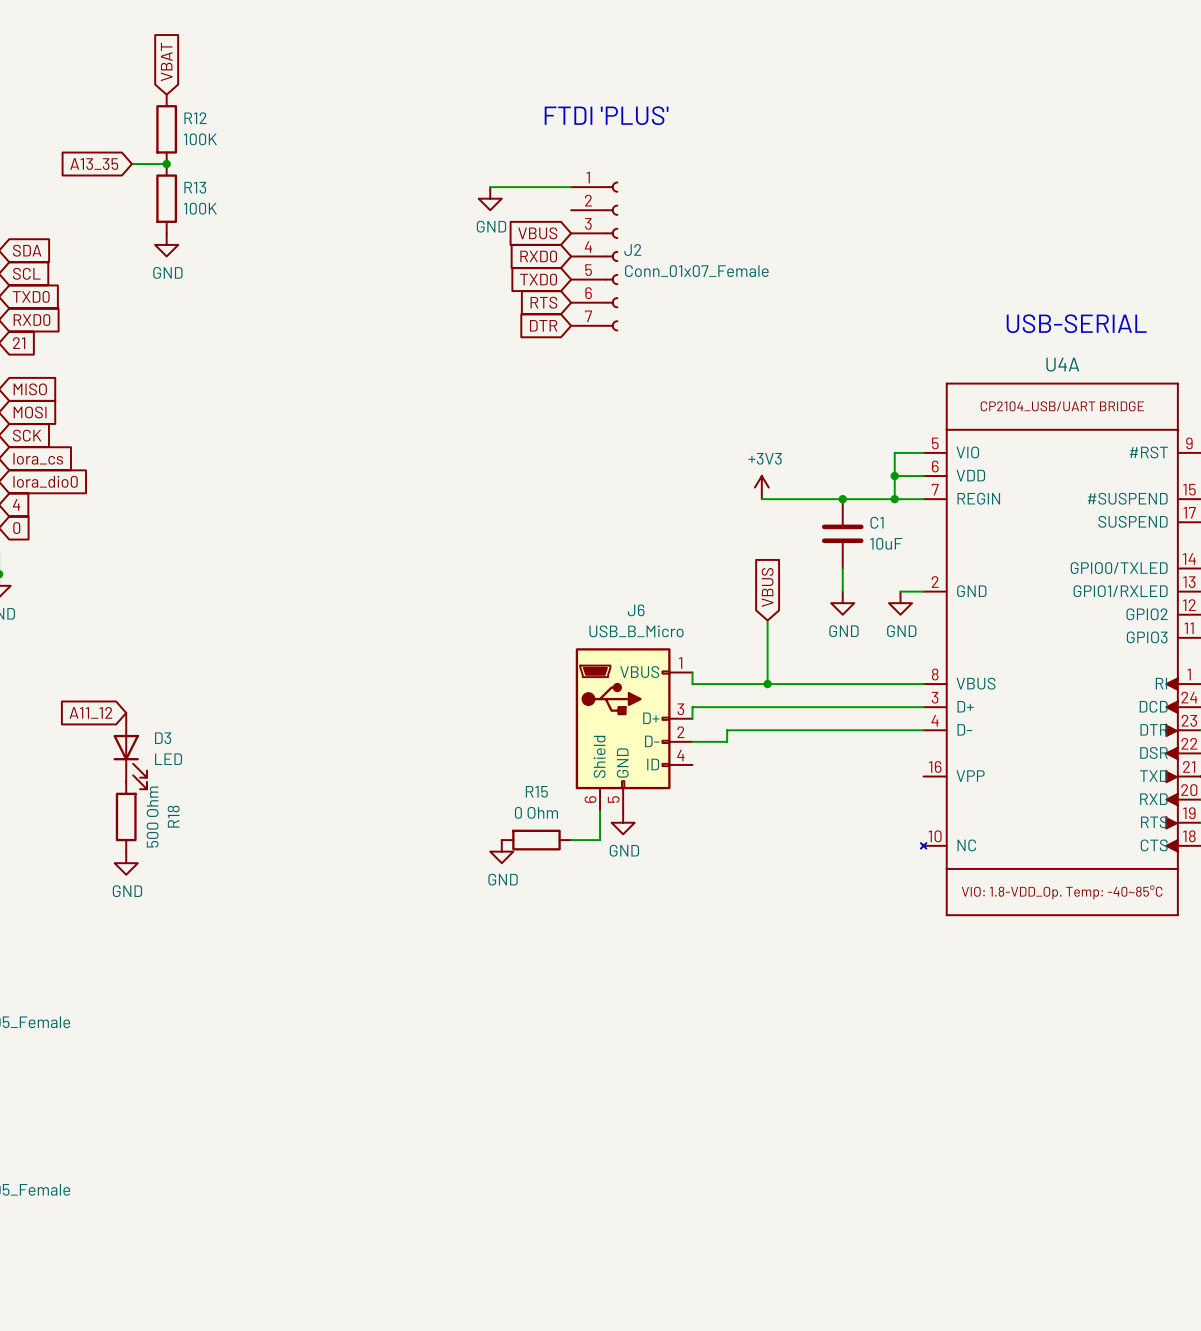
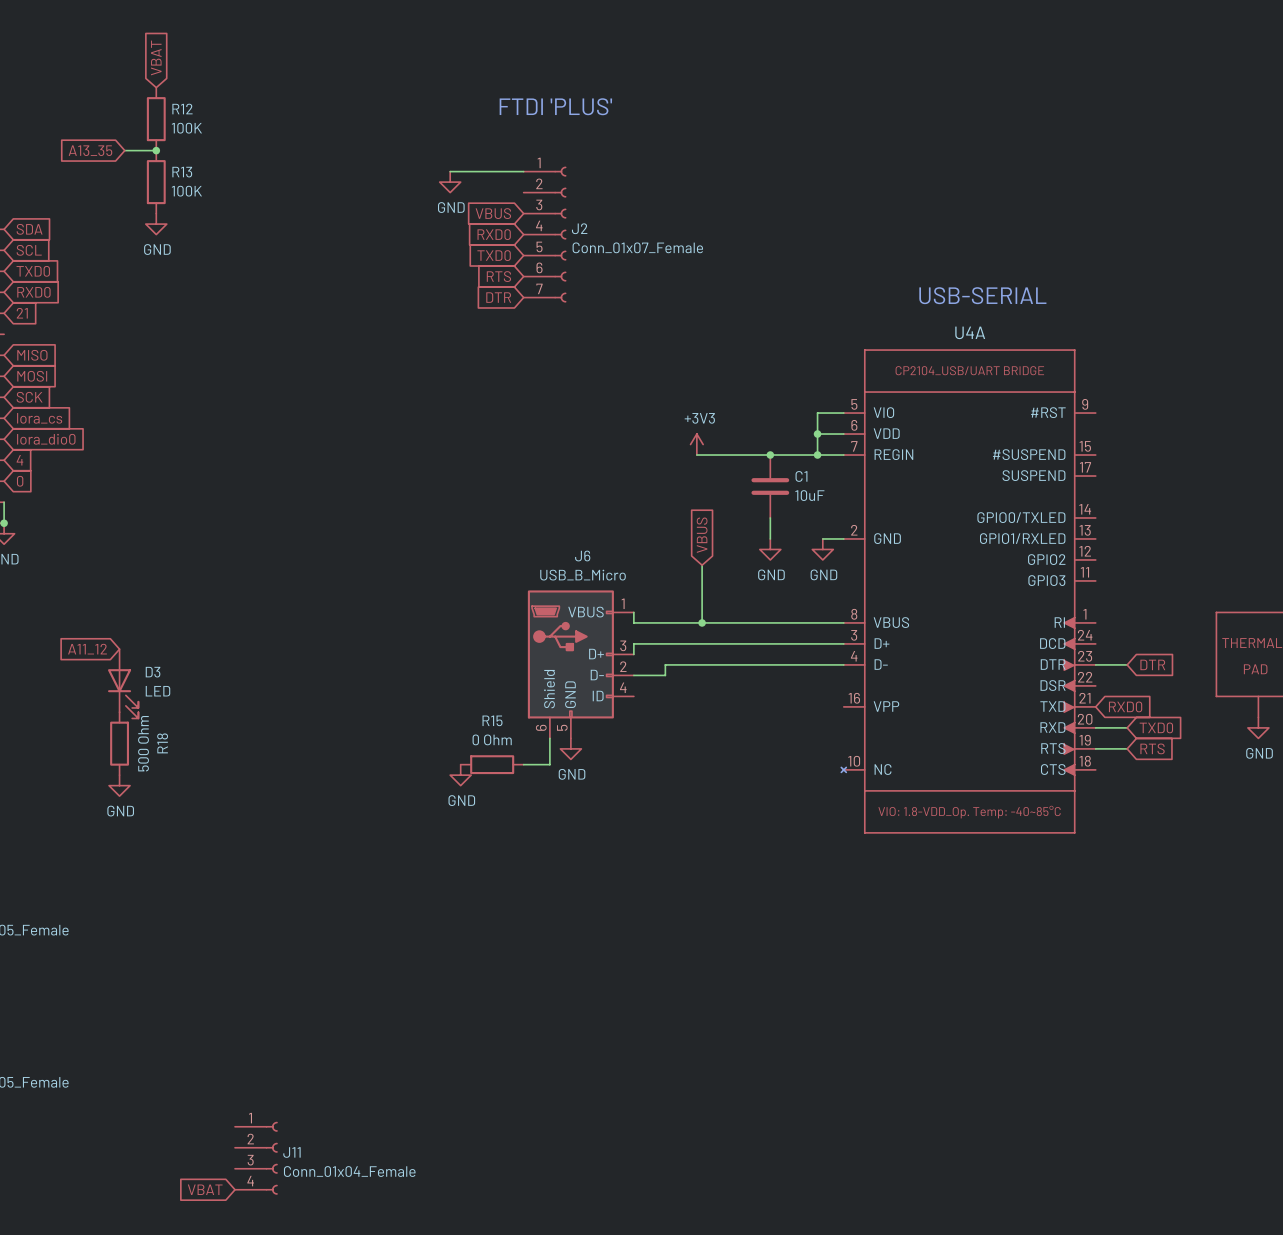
J11: none -> Conn_01x04_Female (256, 1158)
global label: none -> VBAT (205, 1189)

